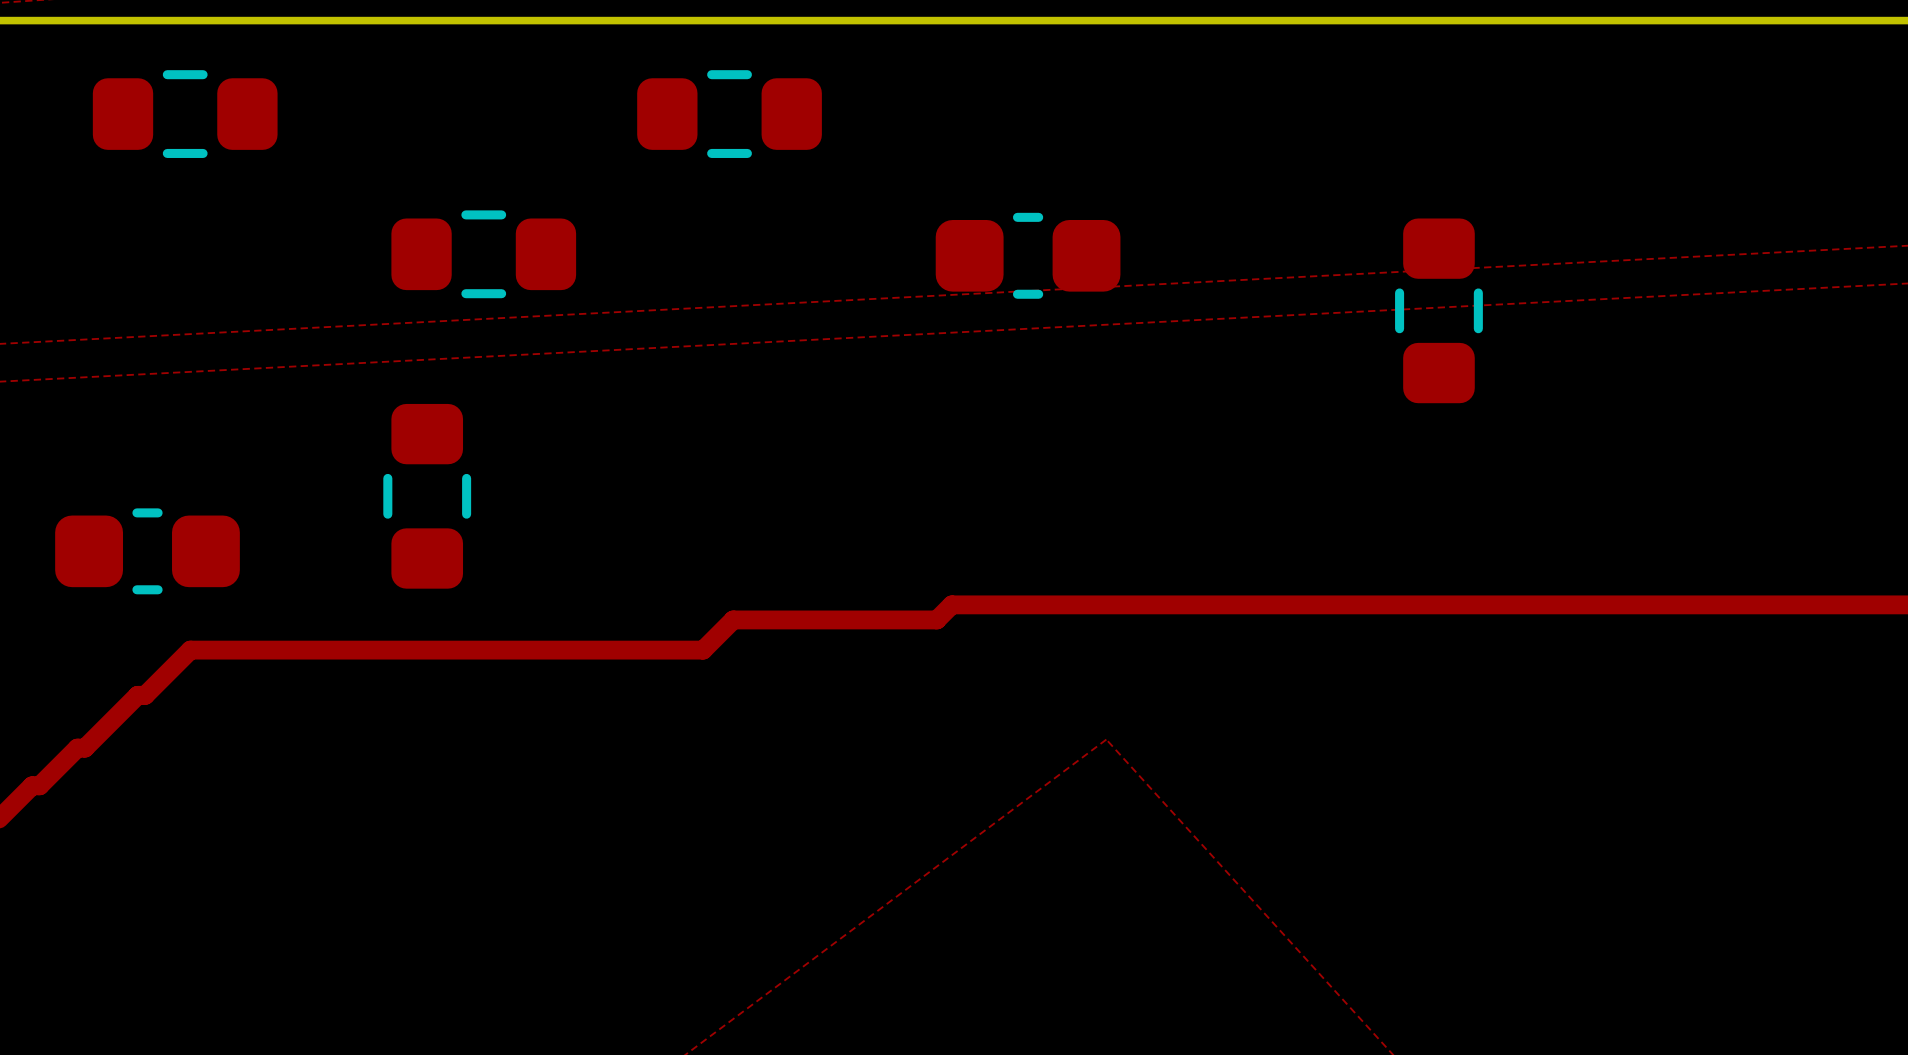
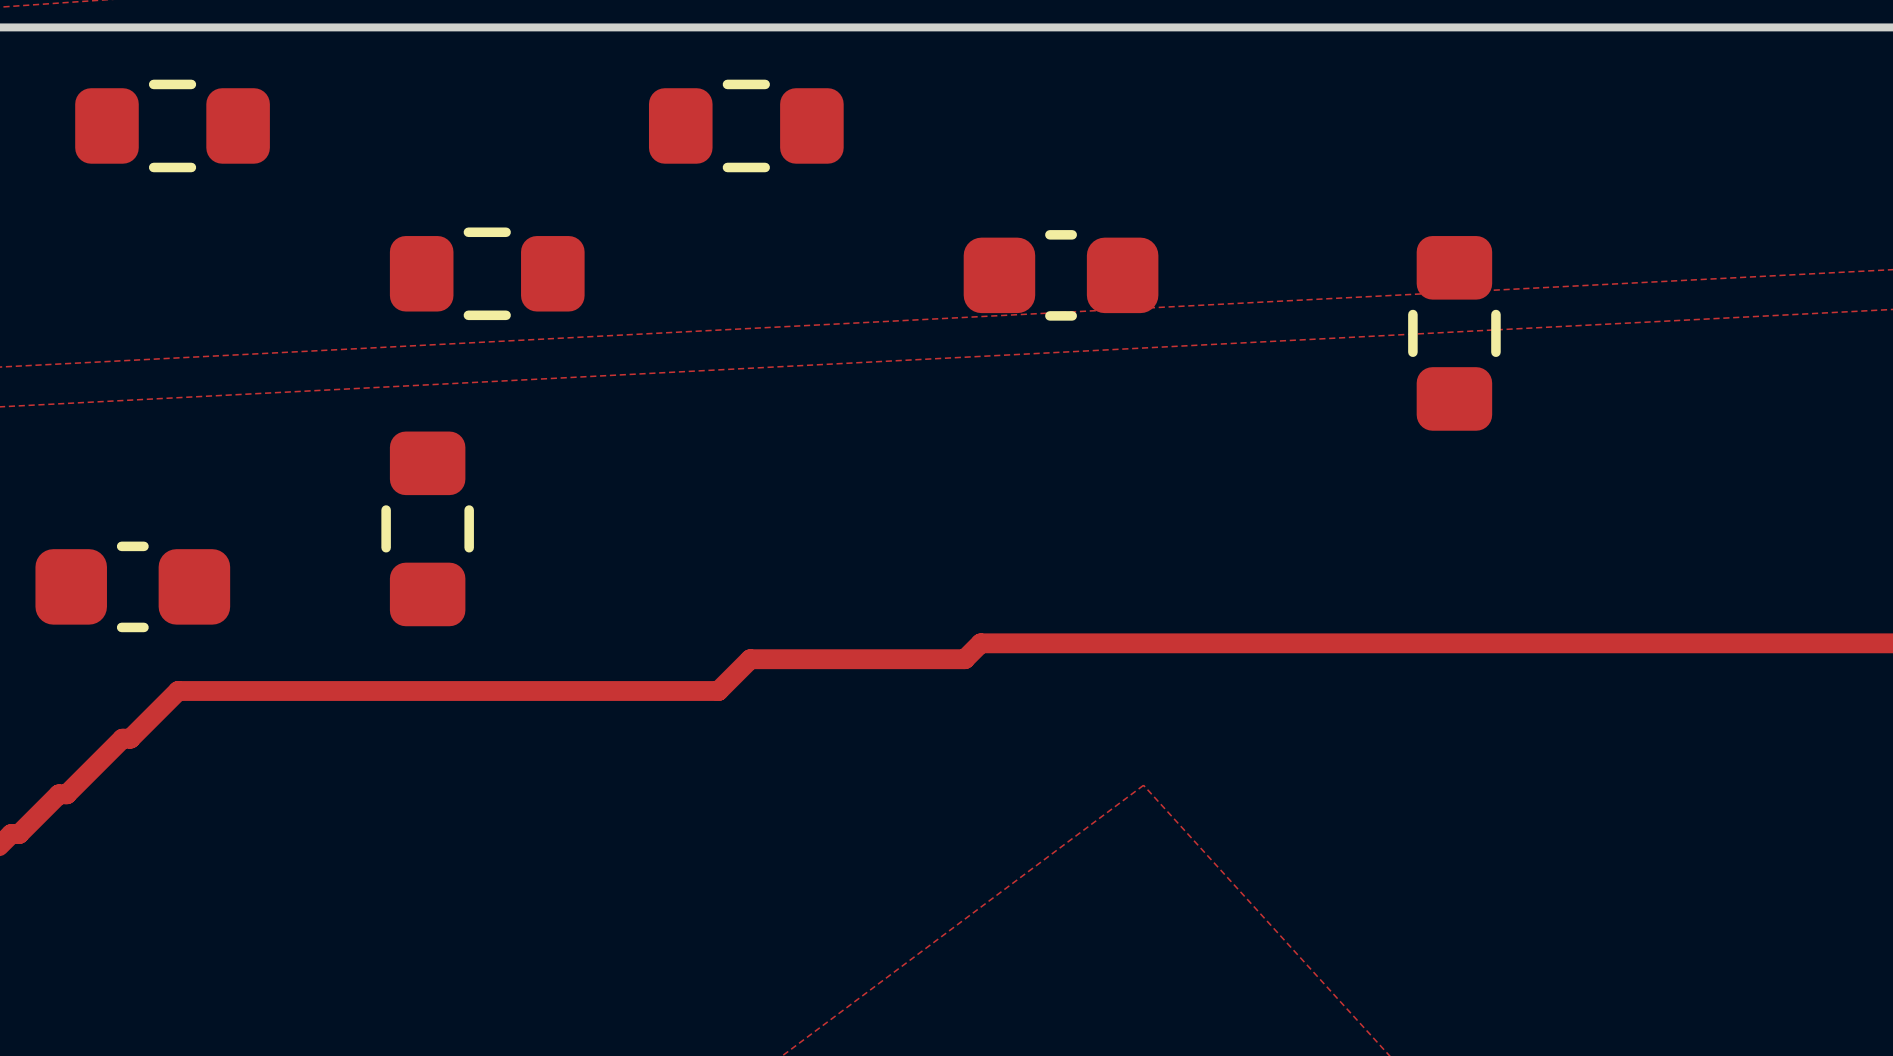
part position: (1438, 310) -> (1454, 333)

